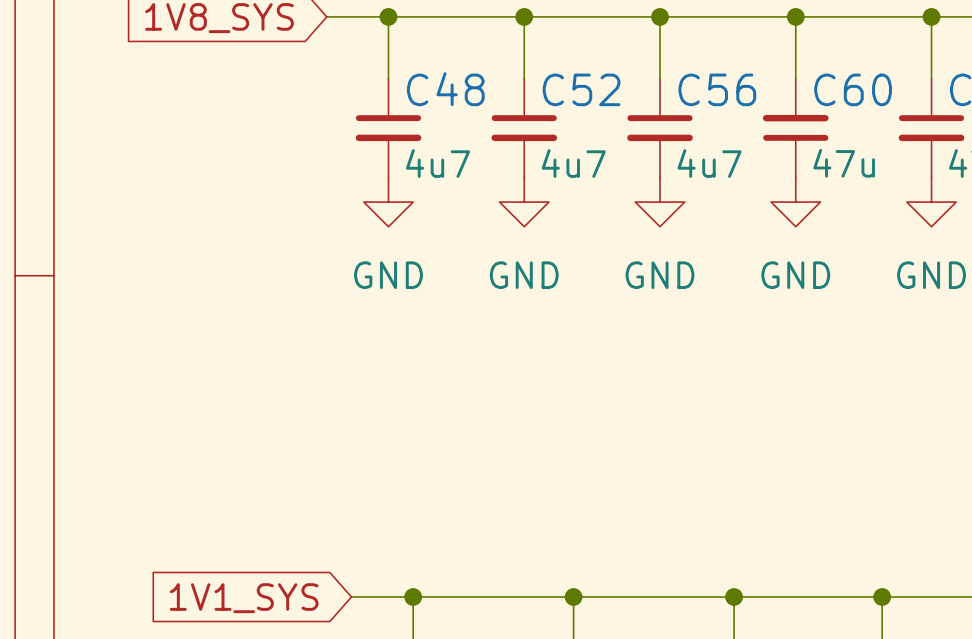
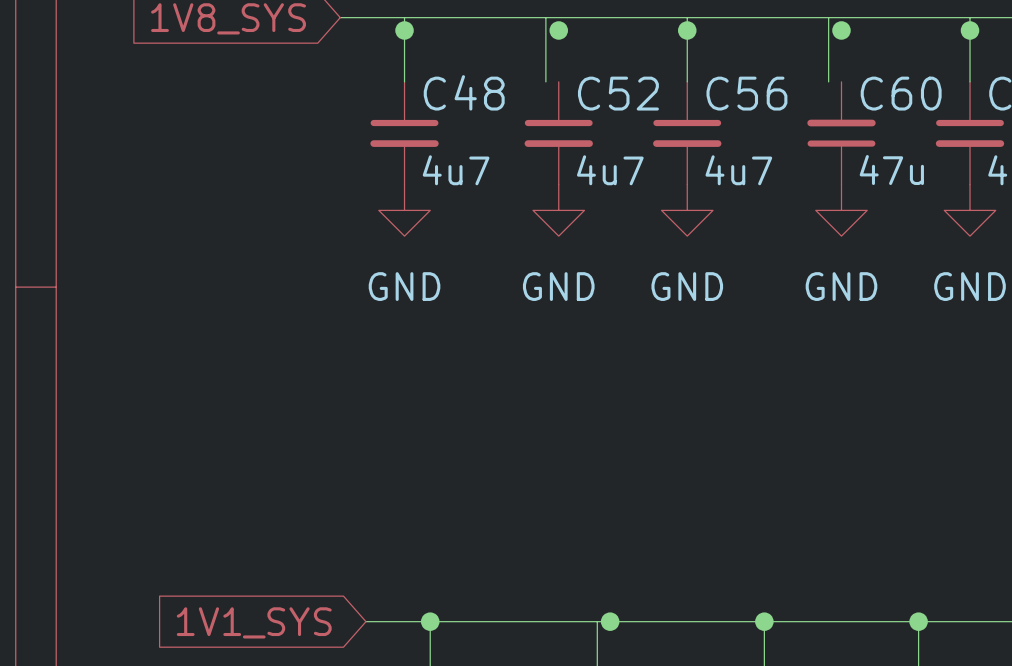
junction position: (388, 16) -> (404, 30)
junction position: (524, 16) -> (558, 30)
junction position: (660, 16) -> (687, 30)
junction position: (795, 16) -> (841, 30)
junction position: (931, 16) -> (970, 30)
C52 position: (524, 128) -> (558, 133)
C60 position: (795, 128) -> (841, 133)
power symbol position: GND (524, 202) -> GND (558, 210)
power symbol position: GND (795, 202) -> GND (841, 210)
junction position: (573, 597) -> (610, 621)

